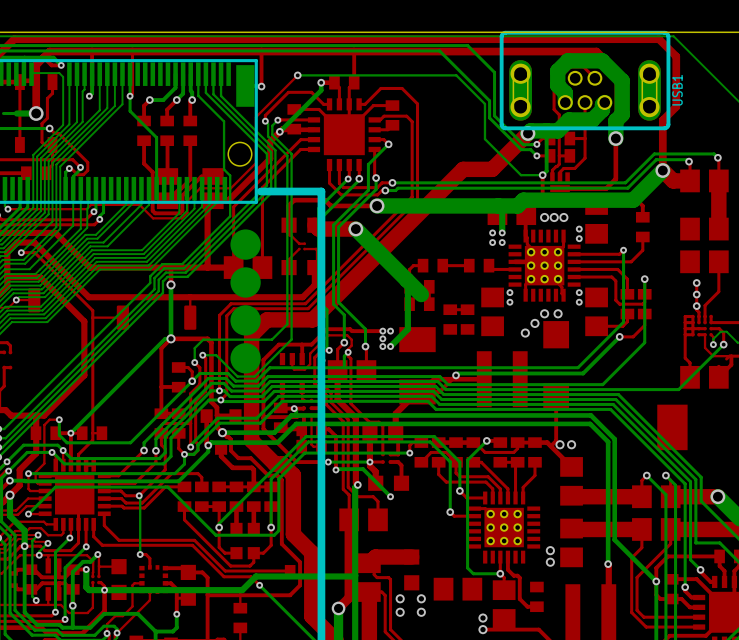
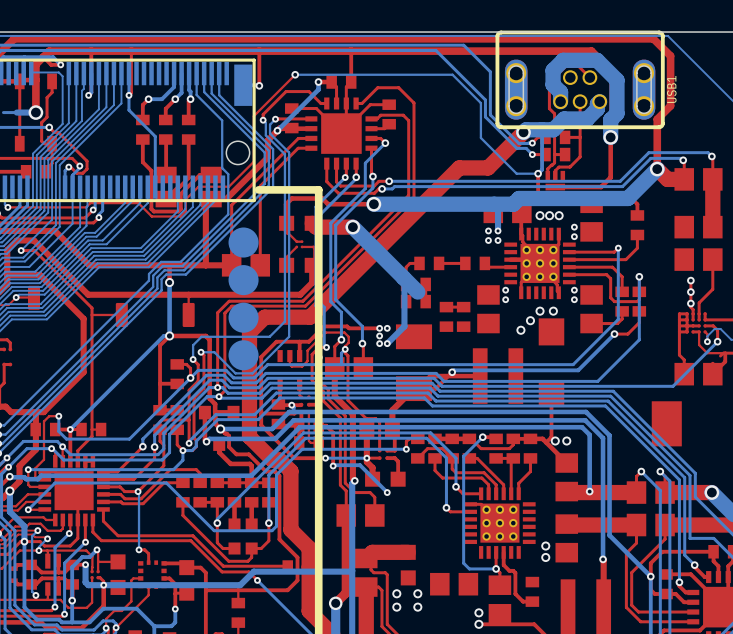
bottom track: (208, 445) (208, 451) (178, 481) (9, 480) -> none
bottom track: none -> (9, 477) (37, 479) (41, 475) (251, 475) (299, 427) (582, 427) (589, 434) (589, 491)
via: none -> (589, 491)

